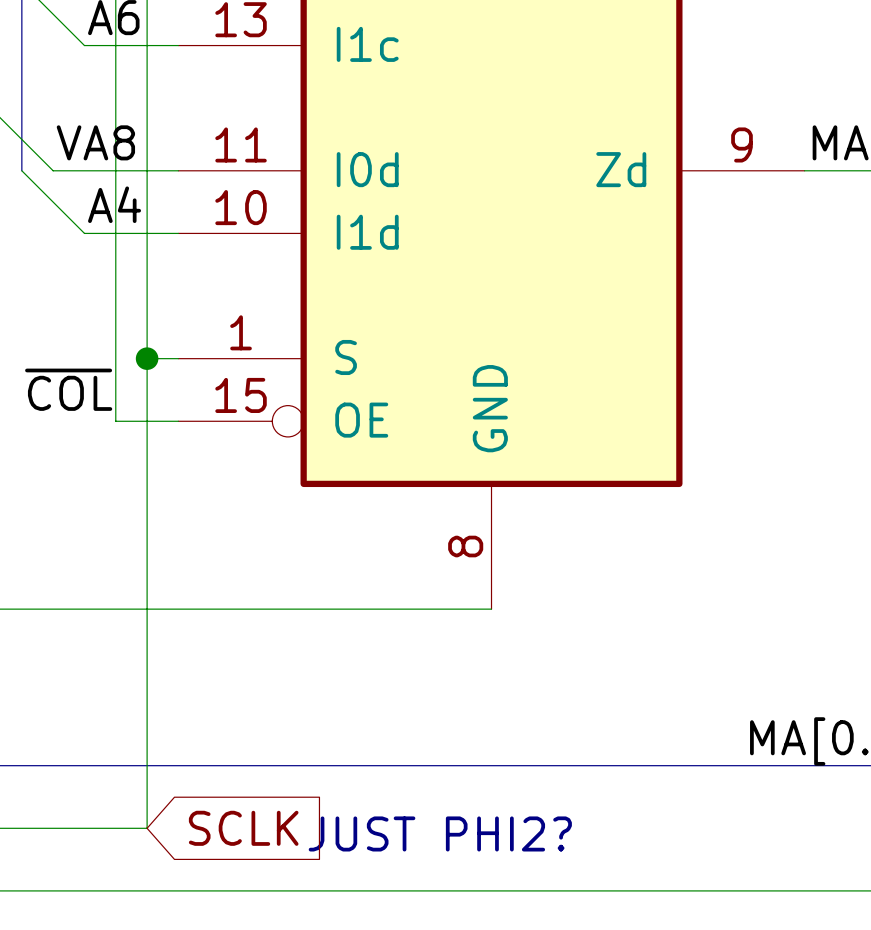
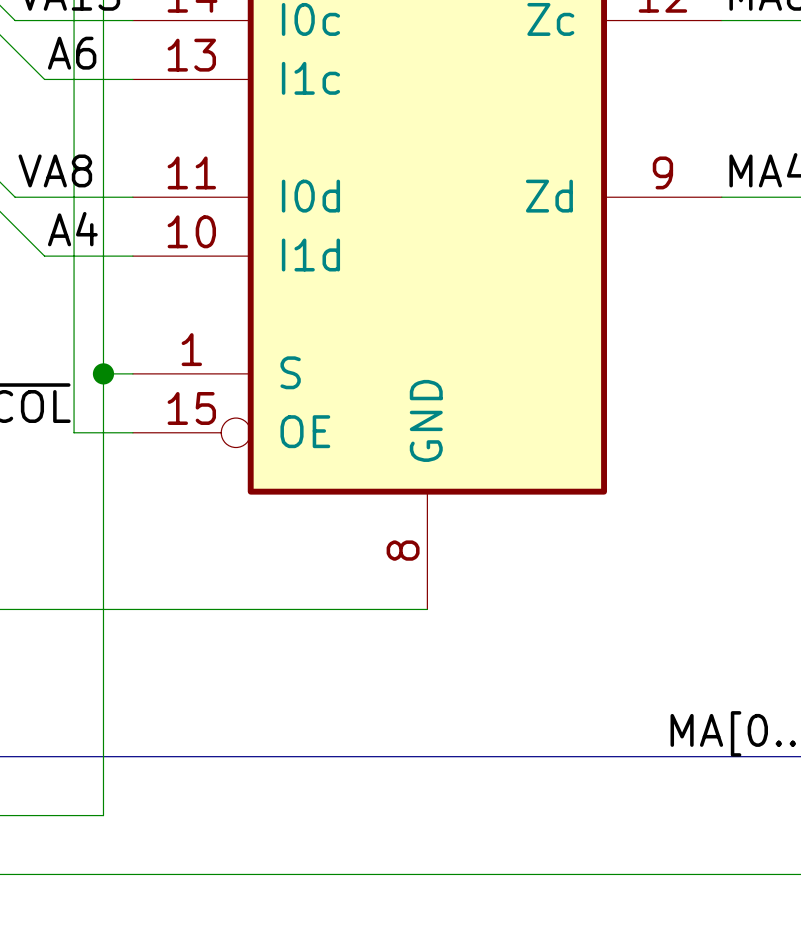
global label: SCLK (243, 828) -> none
text: JUST PHI2? (440, 833) -> none

